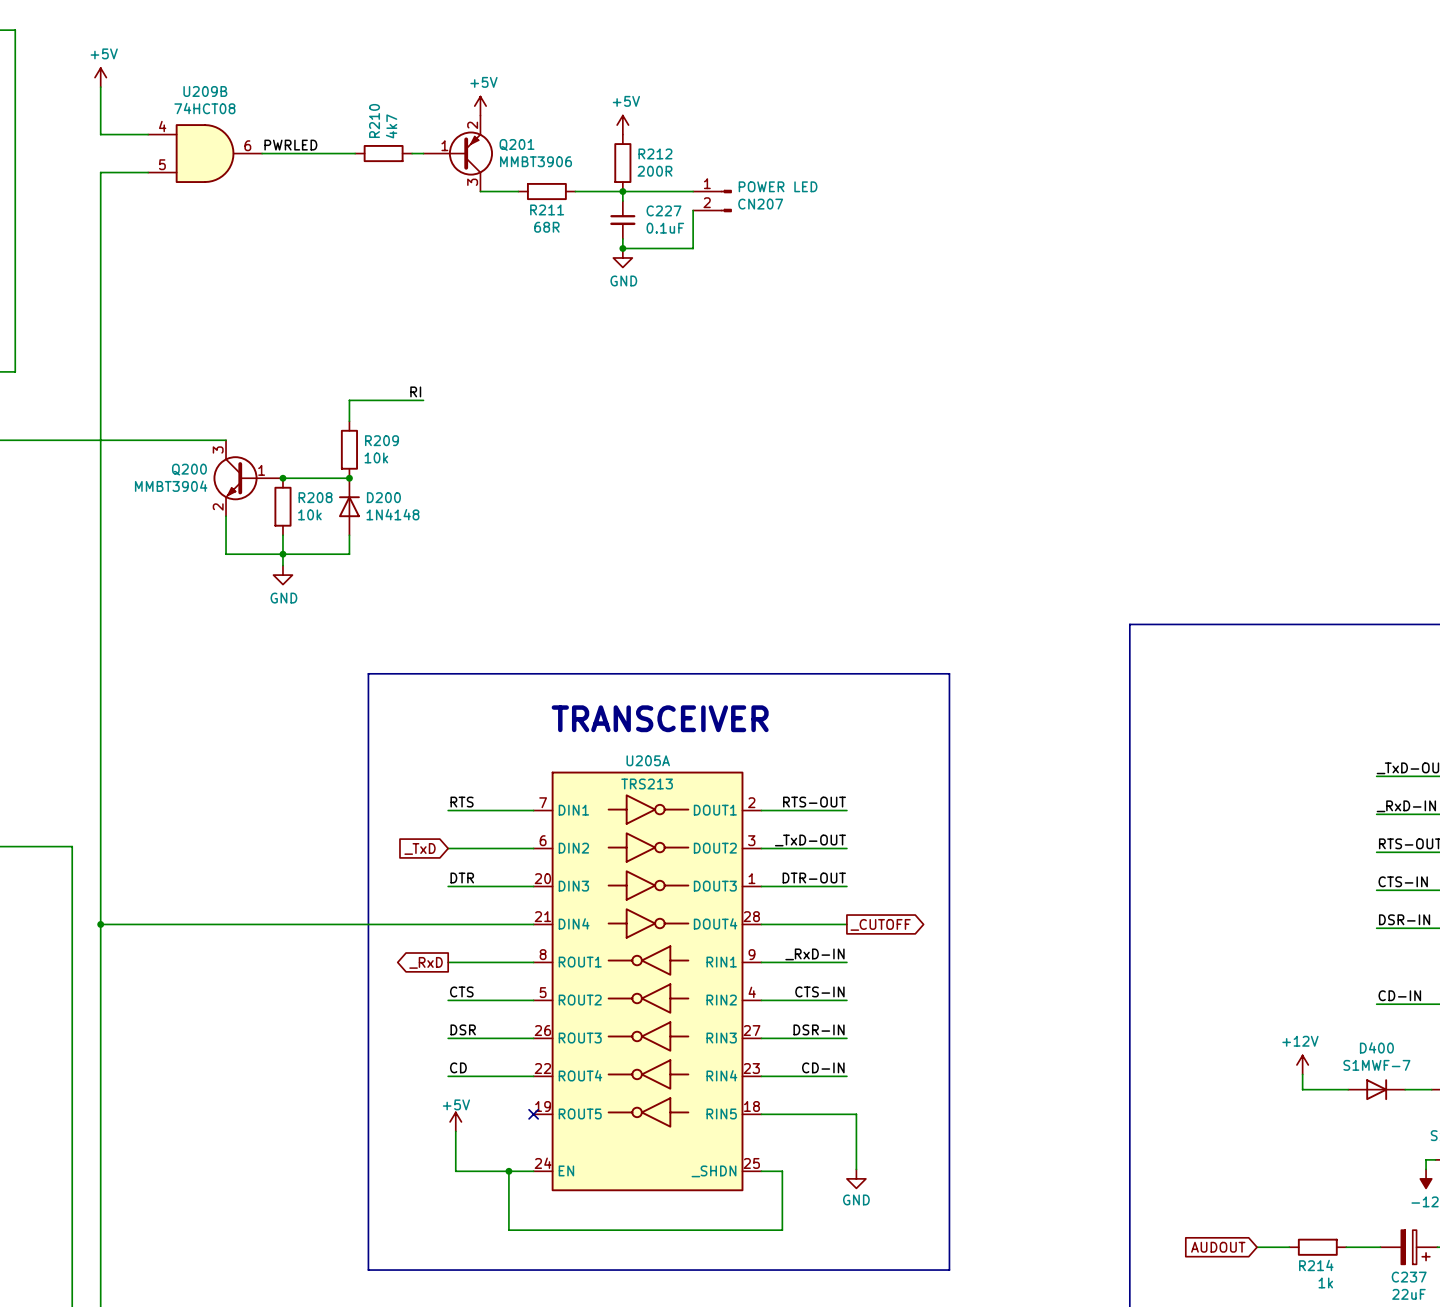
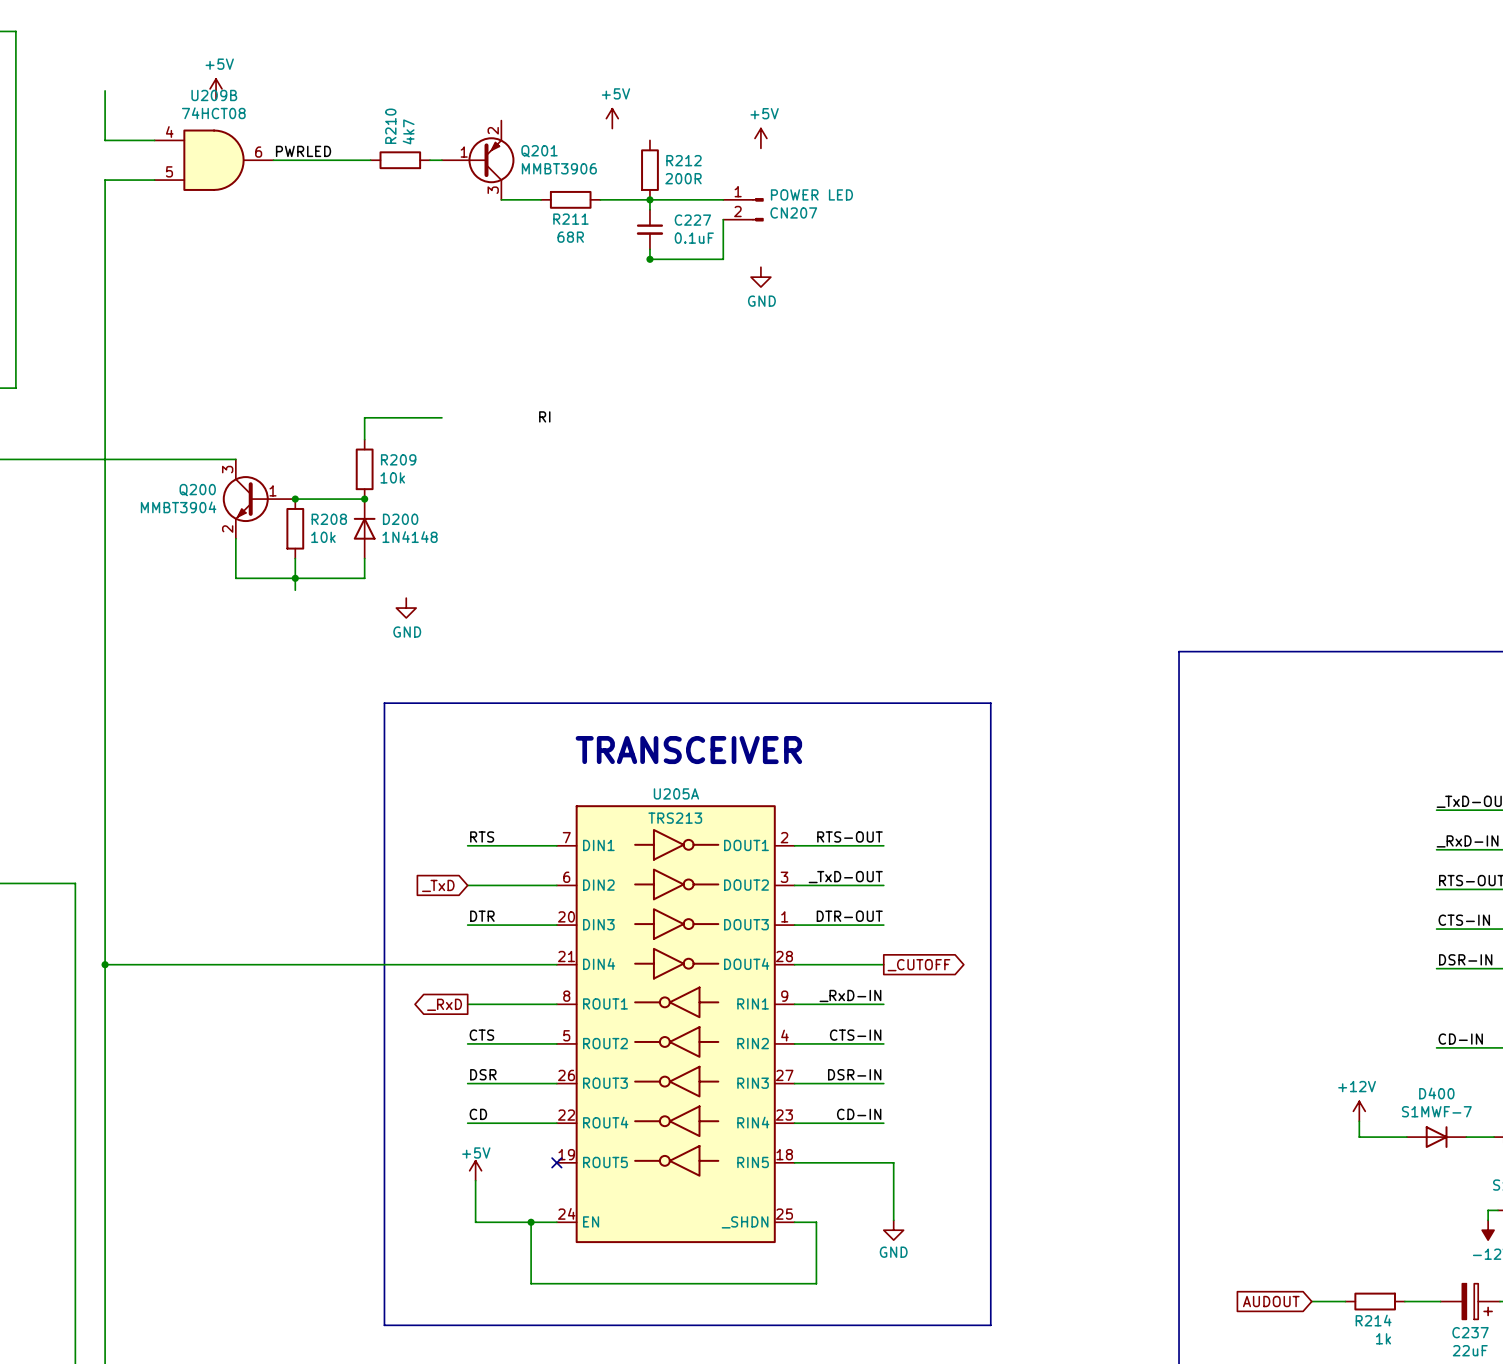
power symbol position: +5V (100, 77) -> +5V (216, 88)
power symbol: +5V (480, 106) -> none
power symbol position: +5V (622, 125) -> +5V (612, 118)
power symbol: none -> +5V (760, 138)
power symbol position: GND (622, 257) -> GND (760, 277)
label position: RI (415, 391) -> RI (544, 416)
power symbol position: GND (282, 575) -> GND (406, 608)

